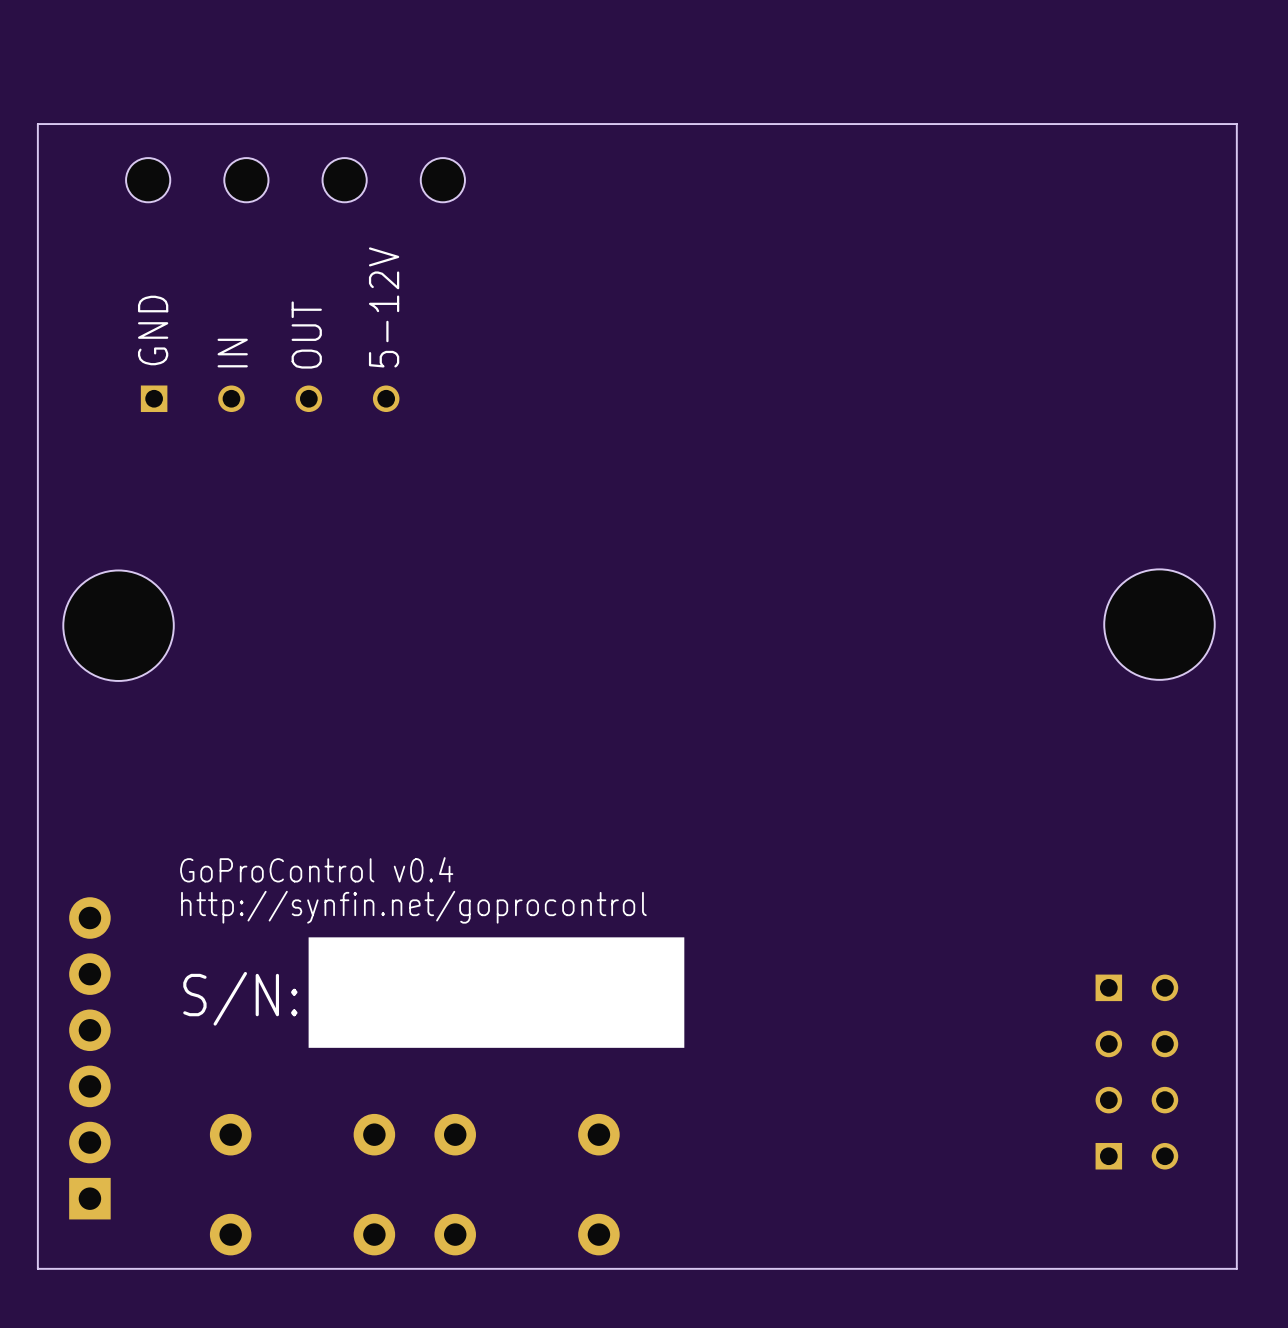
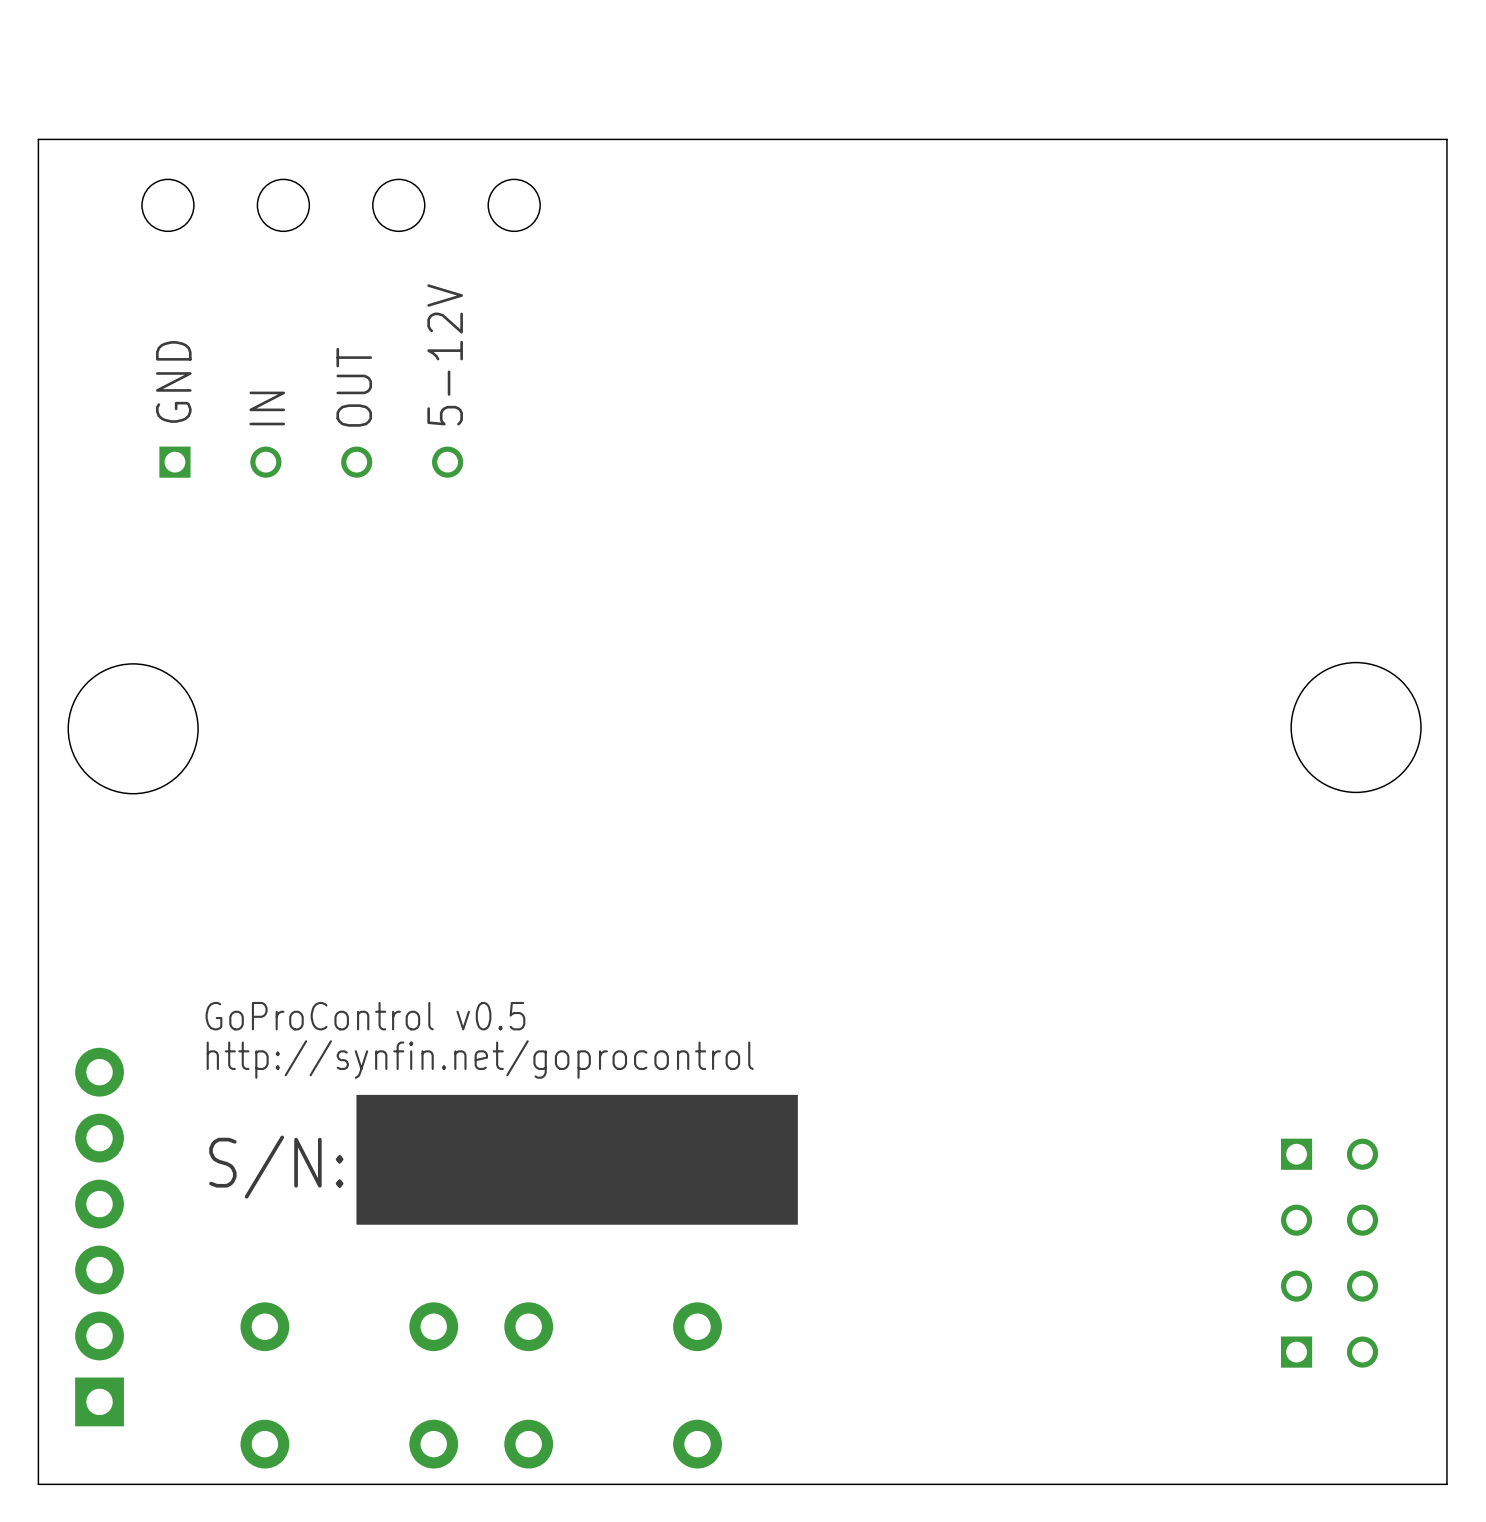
text: GoProControl v0.4 (316, 869) -> GoProControl v0.5 (365, 1016)

